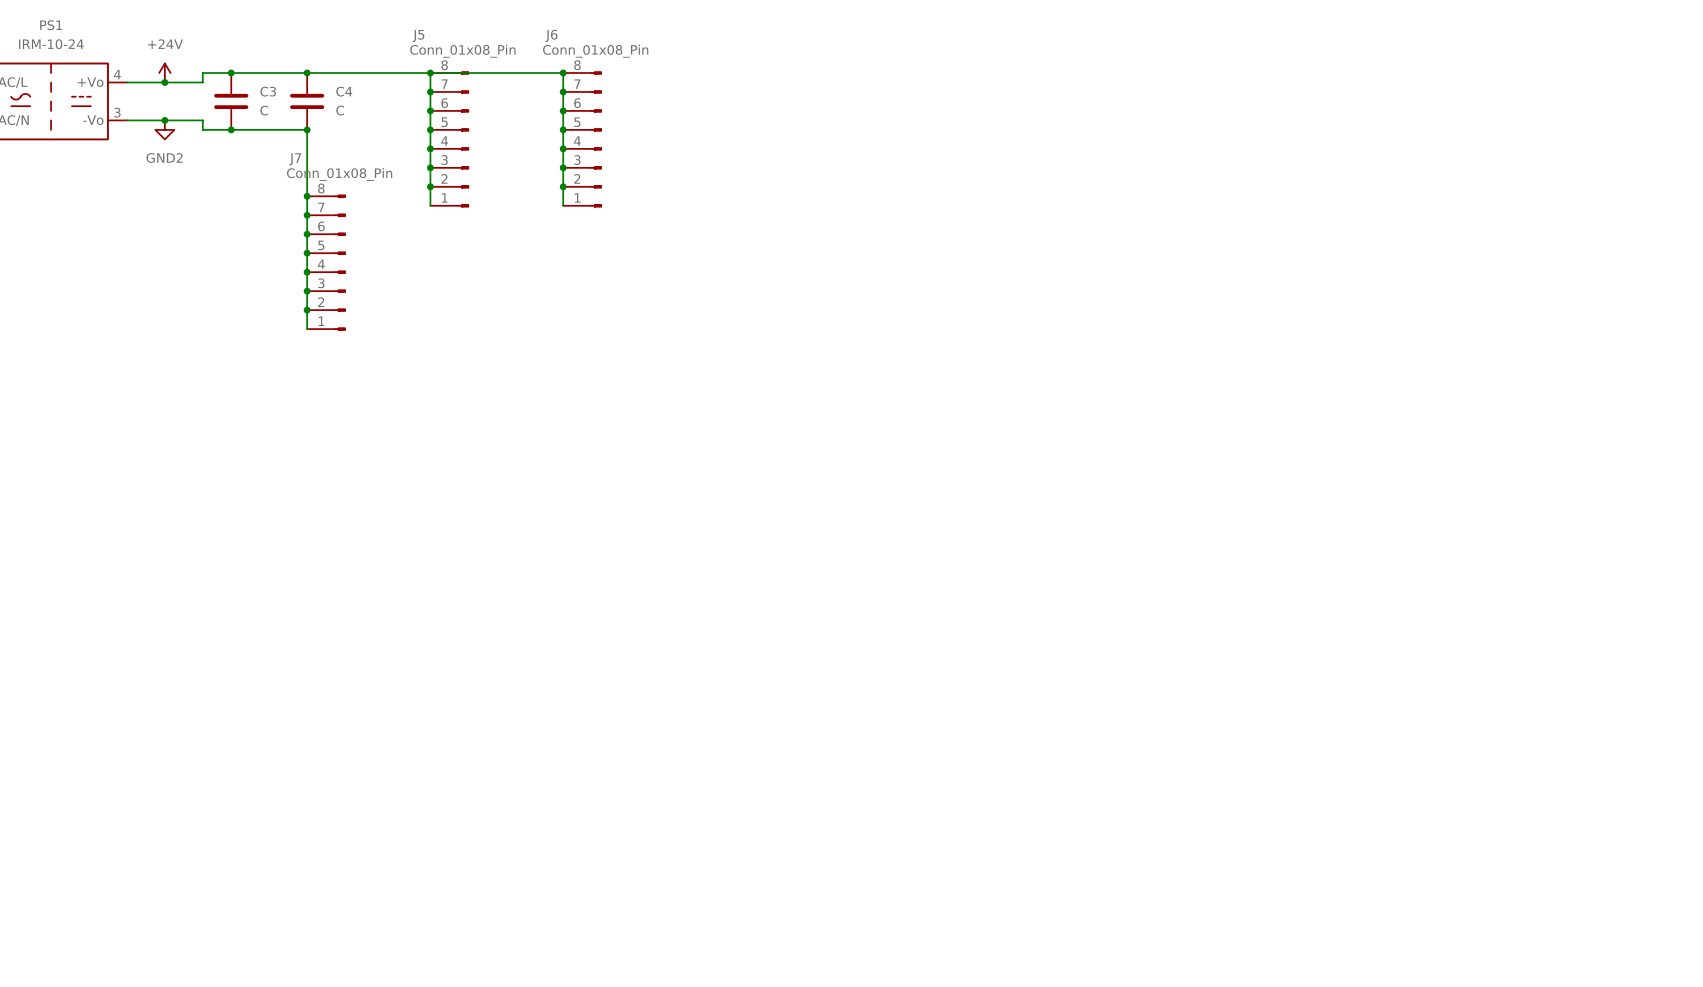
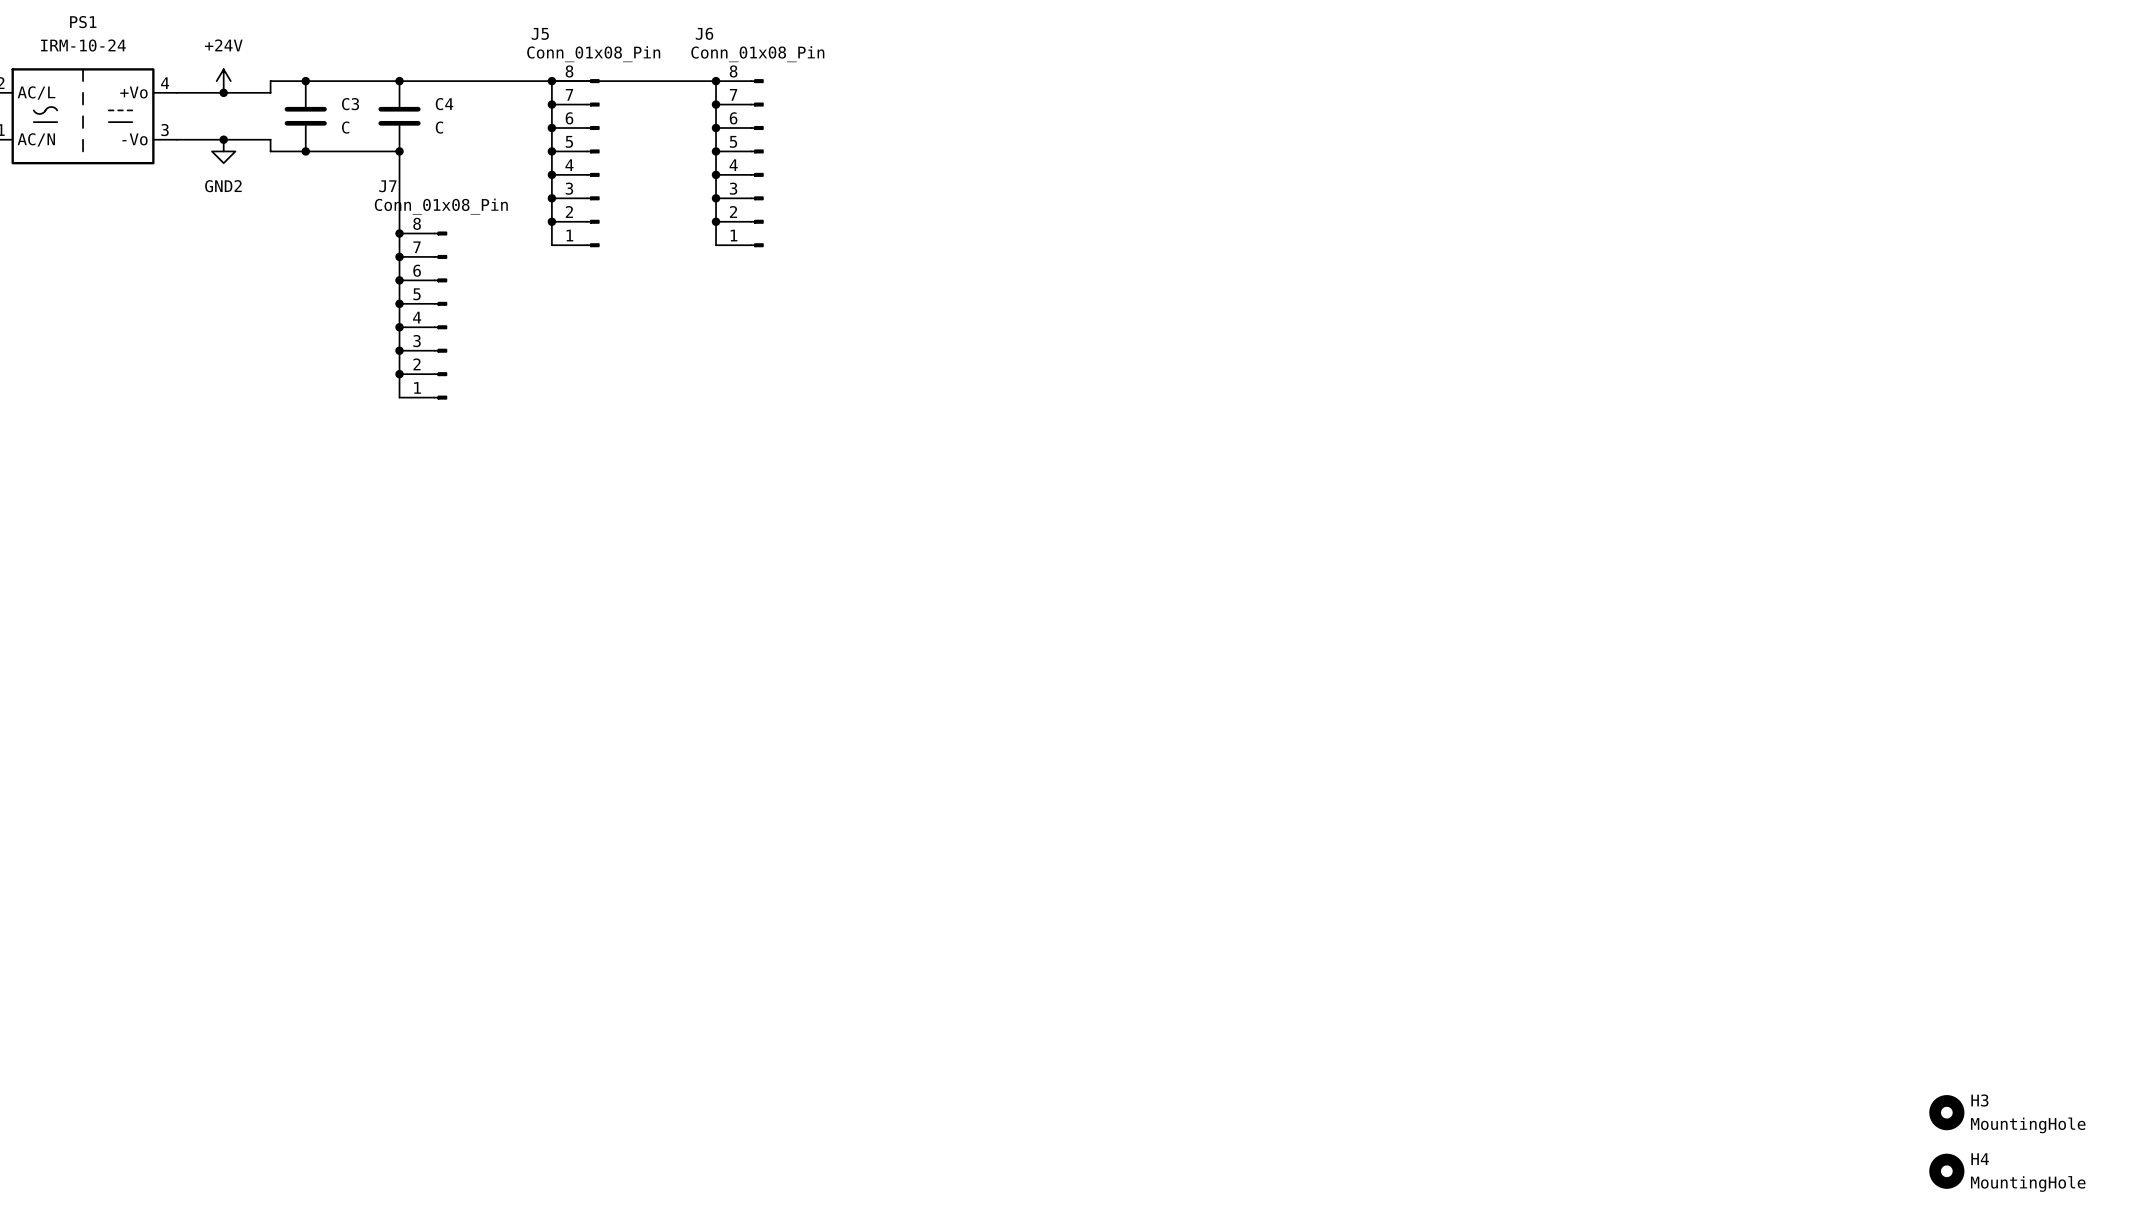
H3: none -> MountingHole (1946, 1112)
H4: none -> MountingHole (1946, 1171)

